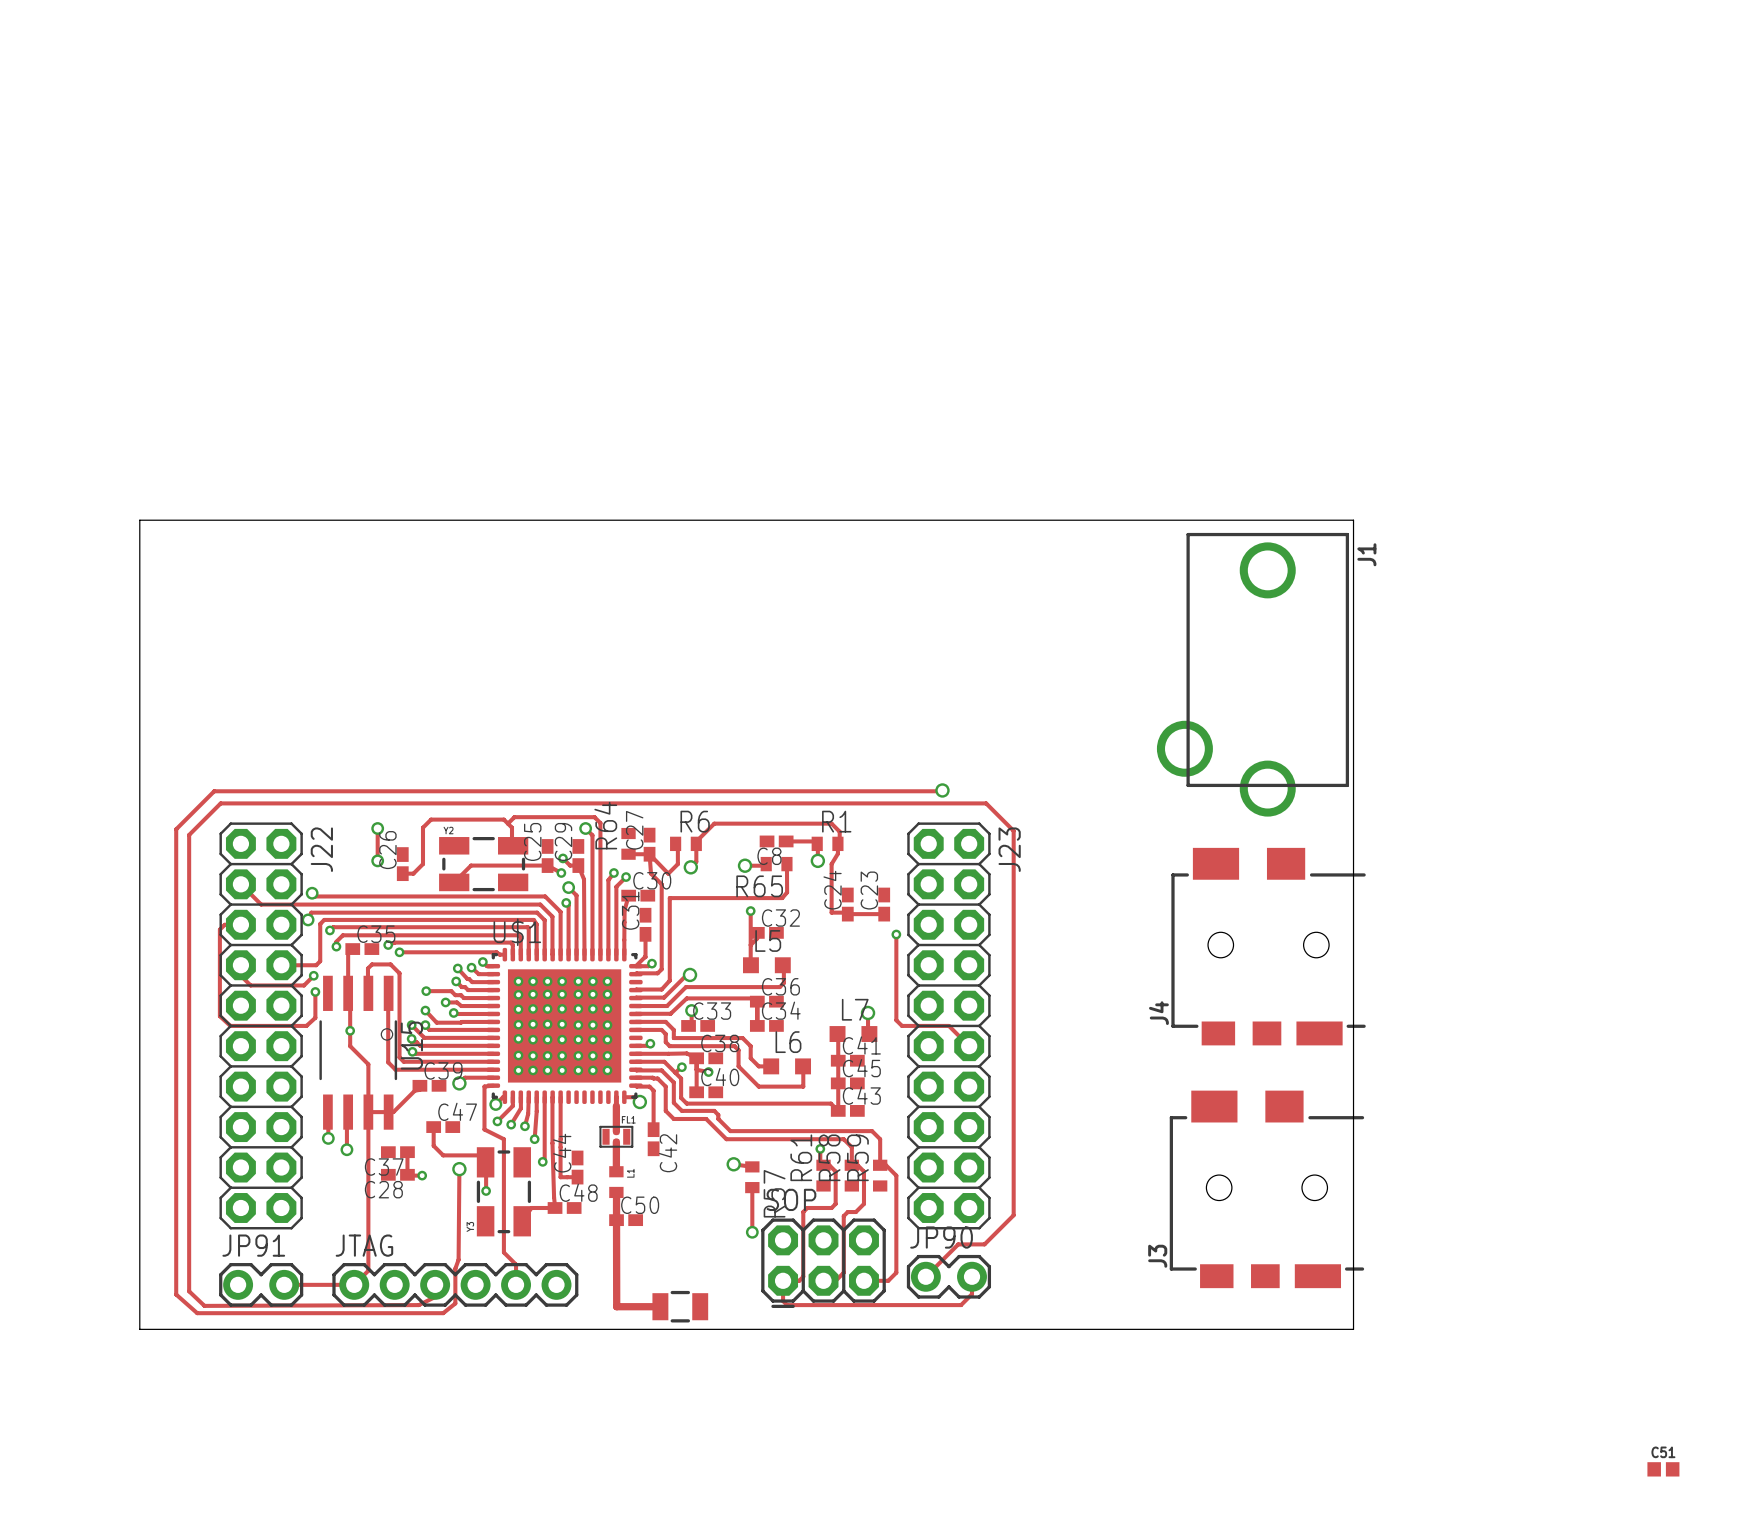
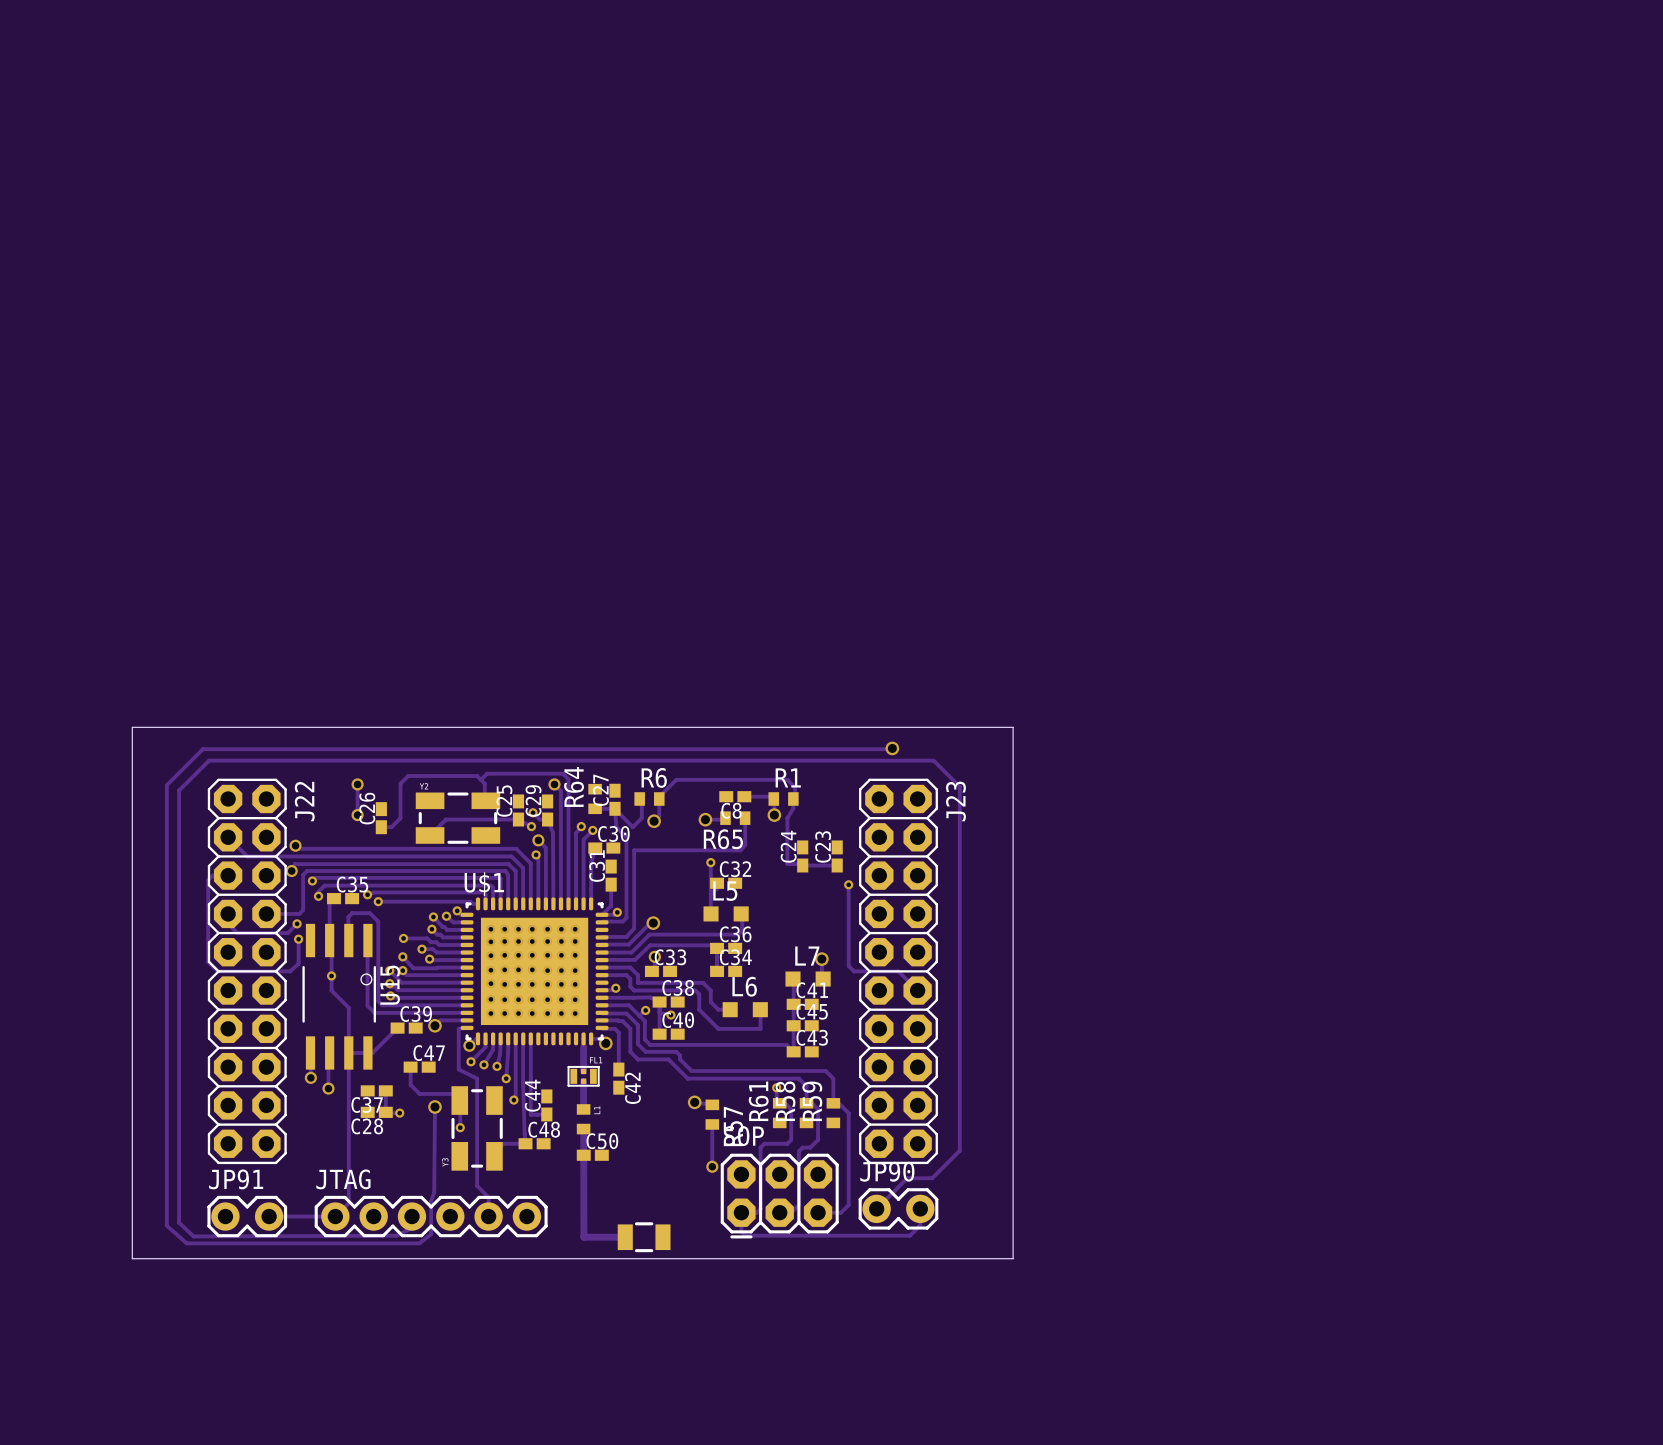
J1: (1252, 674) -> none
board edge: (139, 768) (139, 520) (1353, 520) (1353, 1329) (1070, 1329) -> (132, 727) (1013, 727) (1013, 1258)
J4: (1268, 946) -> none
J3: (1266, 1189) -> none
C51: (1663, 1469) -> none

